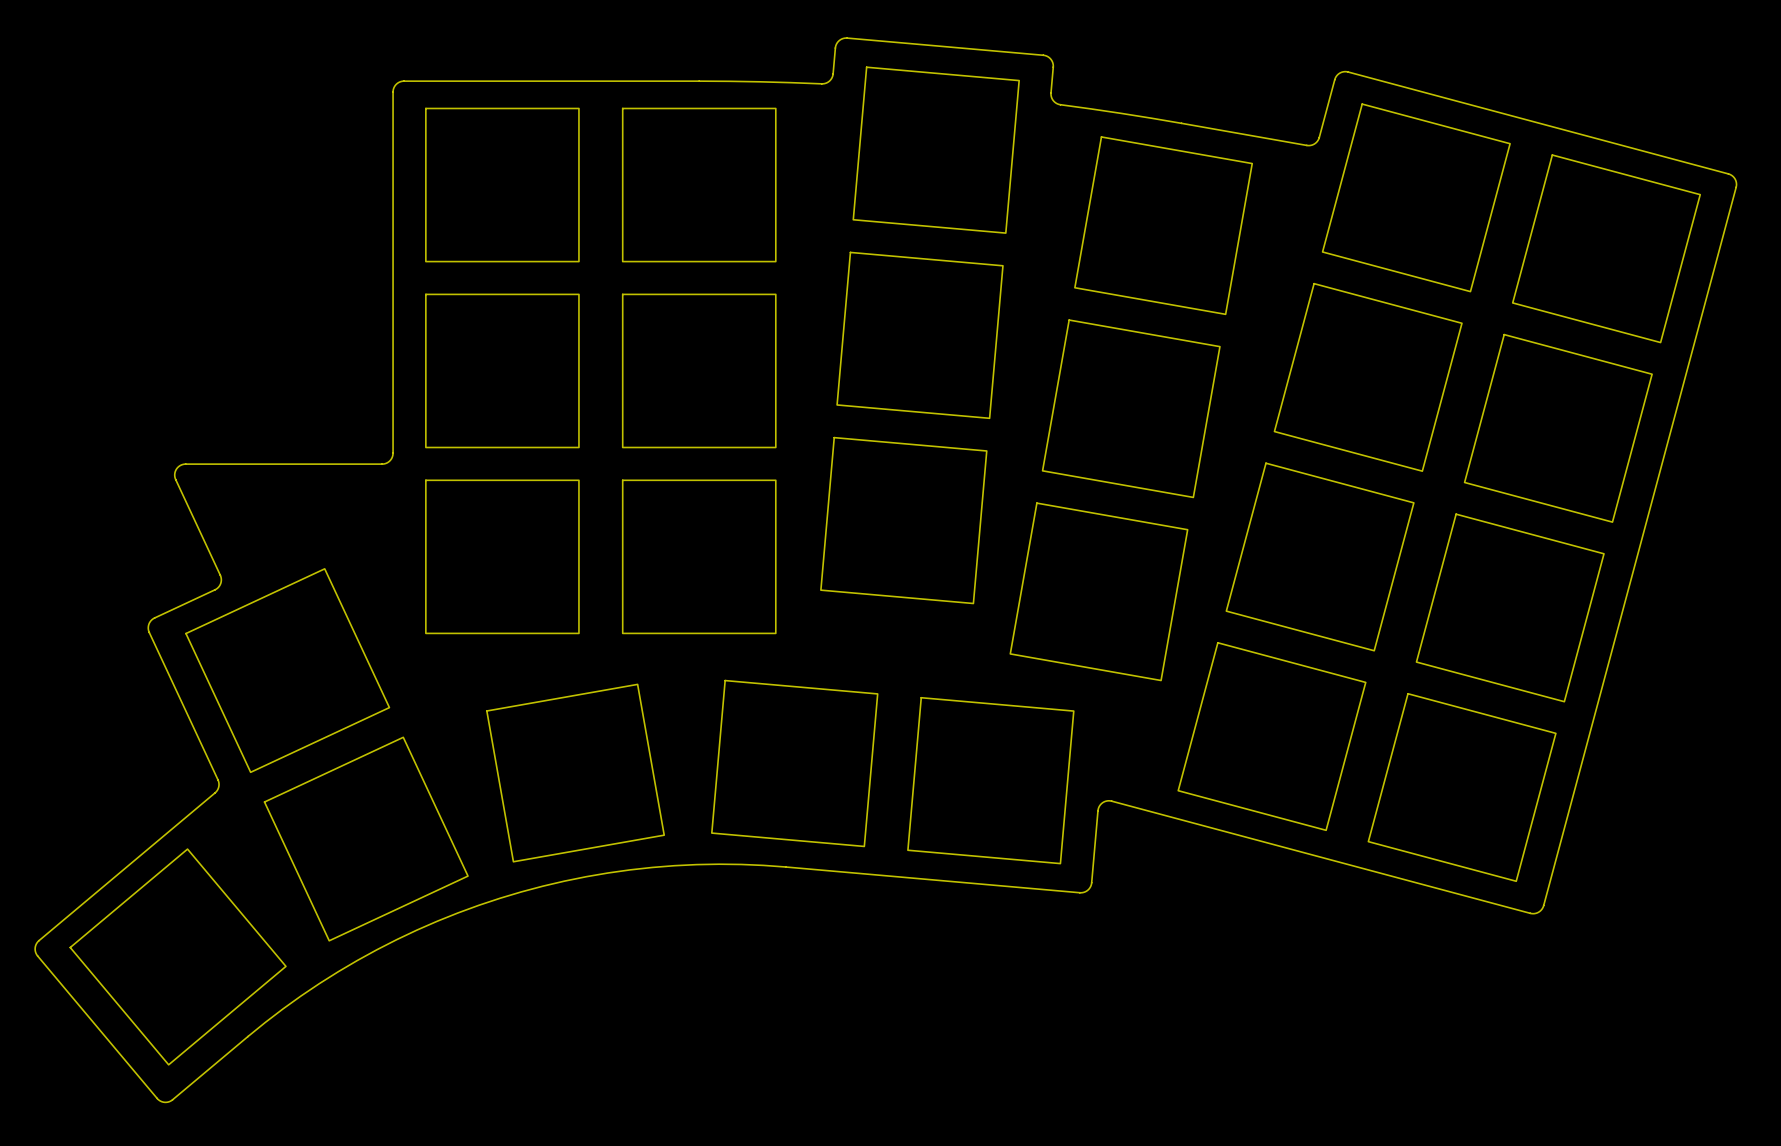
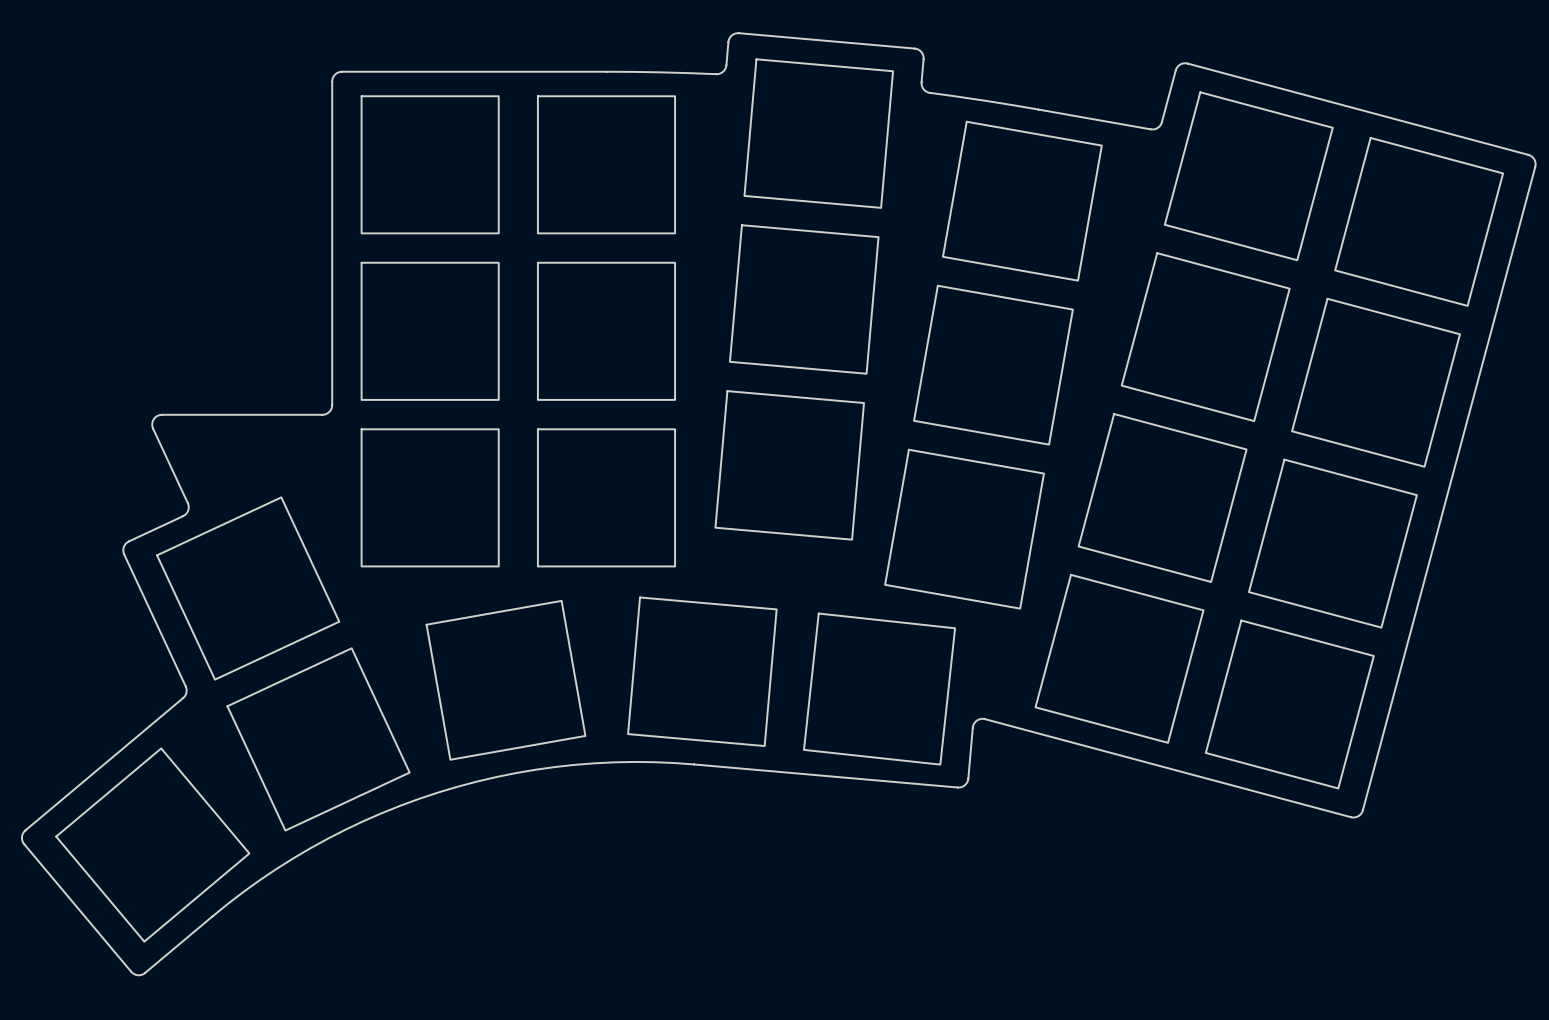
board edge: (203, 464) (181, 464) (175, 470) (174, 477) (220, 575) (220, 583) (215, 589) (153, 618) (148, 628) (218, 779) (218, 788) (215, 792) (39, 940) (35, 948) (37, 956) (157, 1098) (162, 1101) (171, 1100) (265, 1022) (338, 971) (416, 930) (499, 898) (564, 881) (608, 872) (652, 867) (719, 864) (785, 867) (1082, 892) (1087, 890) (1091, 884) (1099, 806) (1107, 800) (1121, 803) -> (162, 414) (154, 418) (152, 427) (187, 503) (188, 509) (183, 516) (127, 541) (124, 545) (123, 551) (185, 686) (186, 693) (25, 830) (21, 837) (24, 844) (135, 974) (145, 972) (228, 903) (293, 858) (363, 820) (438, 792) (496, 777) (535, 769) (594, 763) (634, 761) (694, 764) (960, 787) (964, 785) (968, 779) (973, 725) (977, 719) (985, 719)
drawing position: (287, 670) -> (248, 588)
drawing: none -> [803, 612, 956, 766]
drawing: [907, 697, 1075, 865] -> none
drawing position: (794, 763) -> (702, 671)
drawing position: (575, 773) -> (506, 680)
drawing position: (366, 839) -> (318, 739)
drawing position: (178, 956) -> (152, 845)

